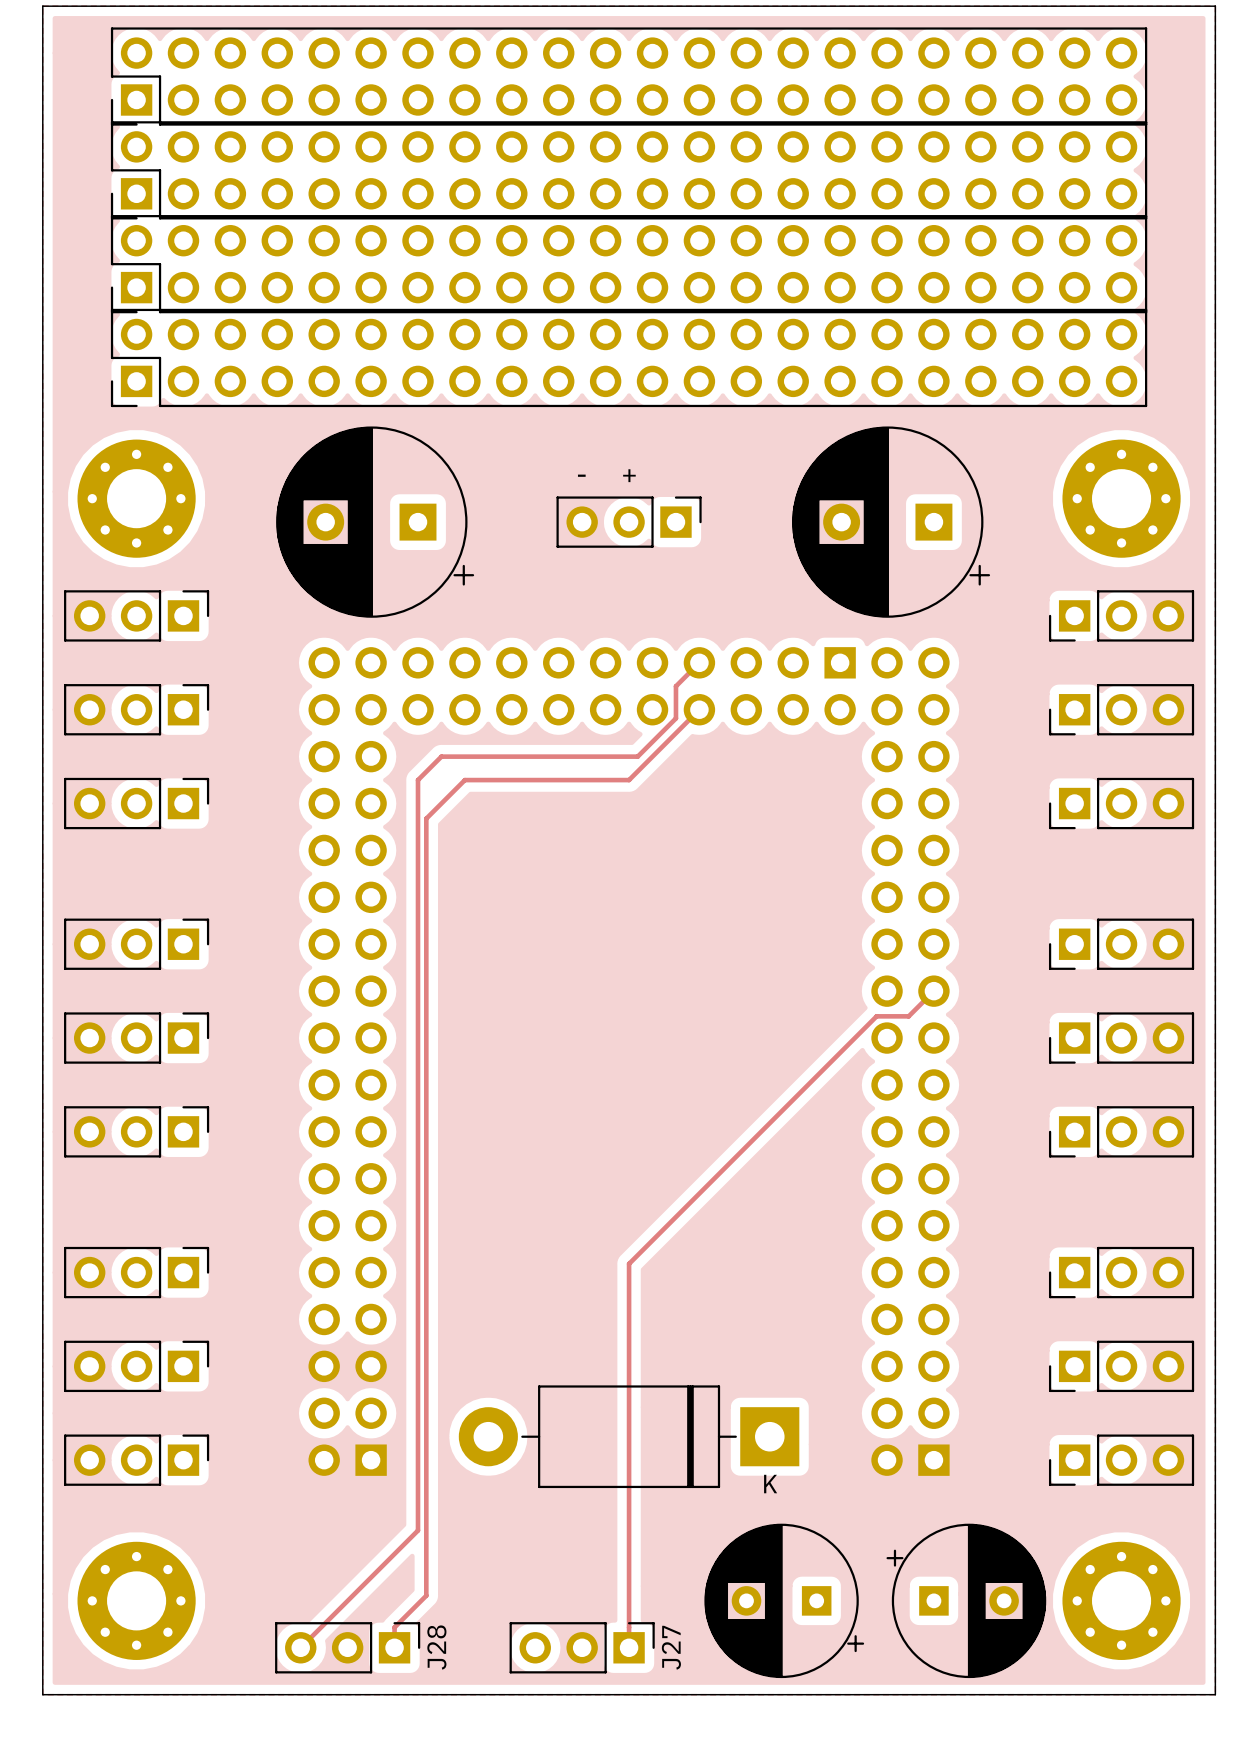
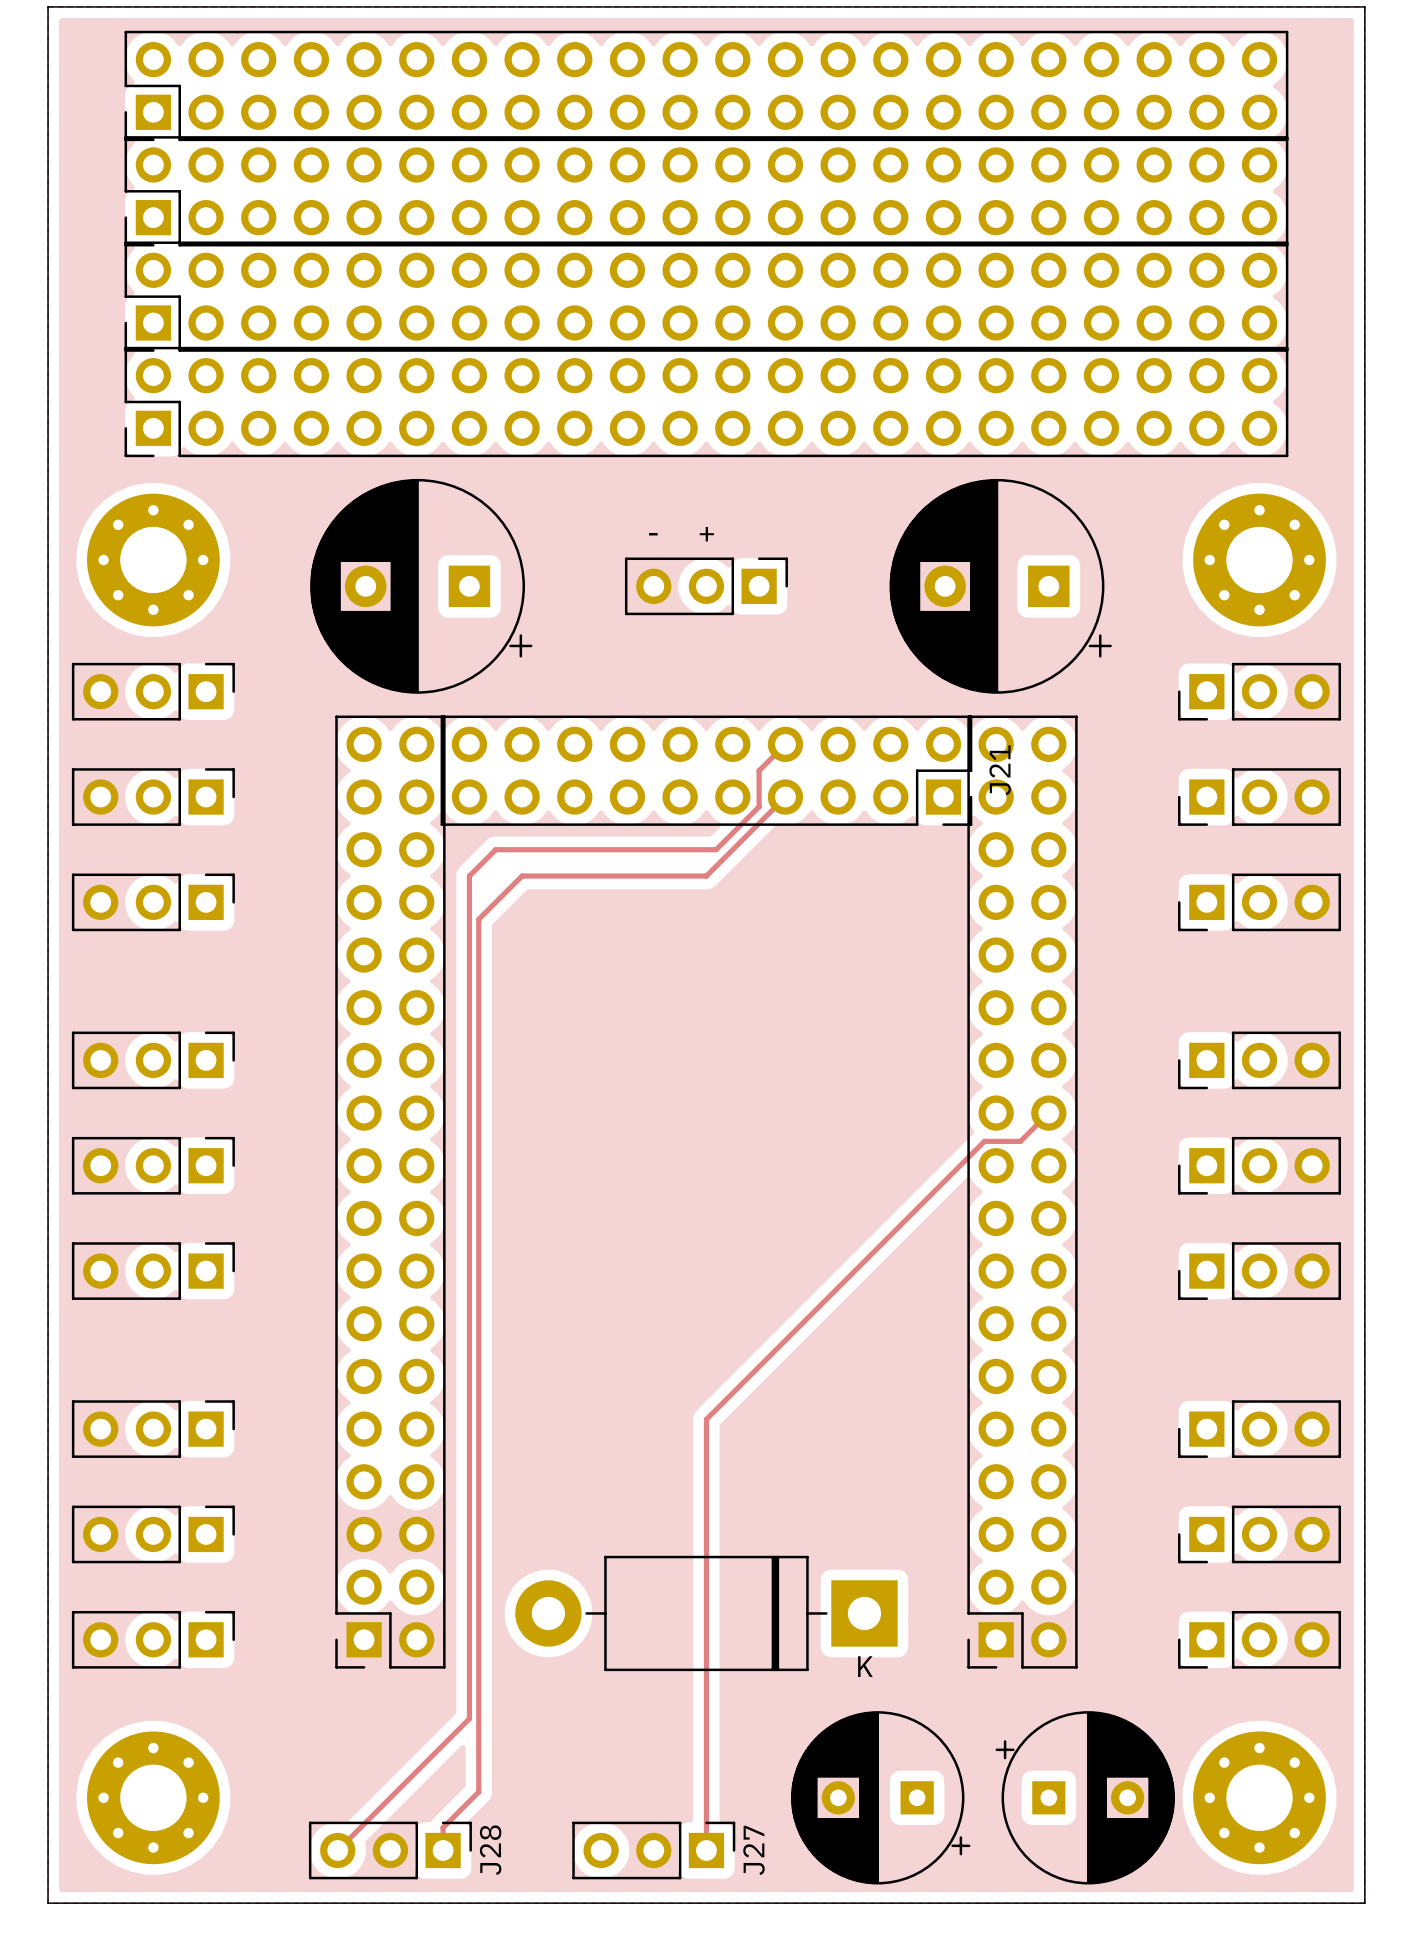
J21 side: bottom (629, 686) -> top (706, 770)
part side: bottom (347, 1061) -> top (390, 1192)
part side: bottom (910, 1061) -> top (1022, 1192)

